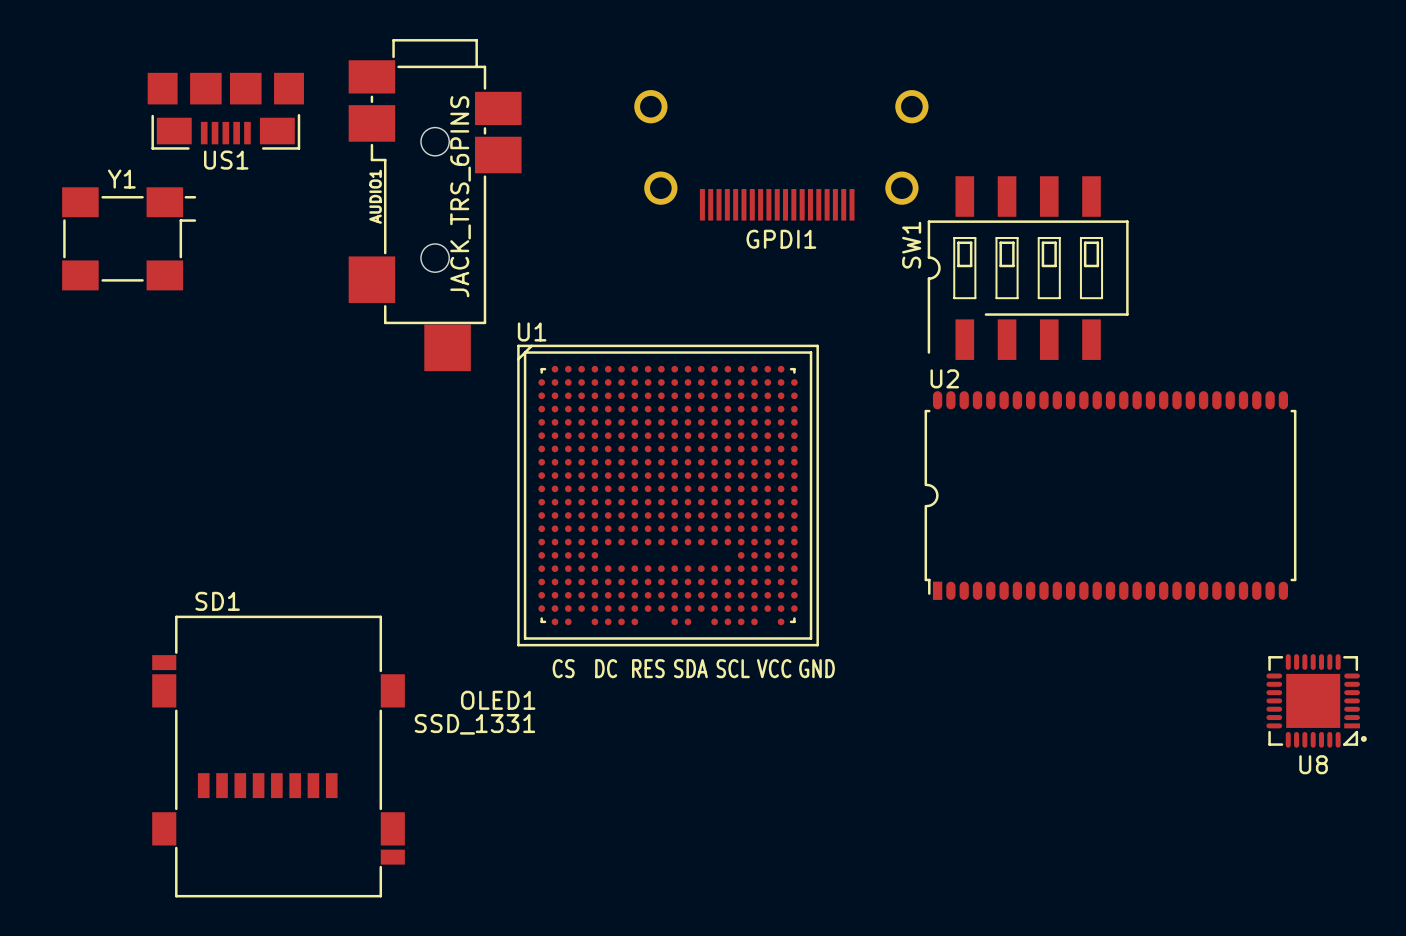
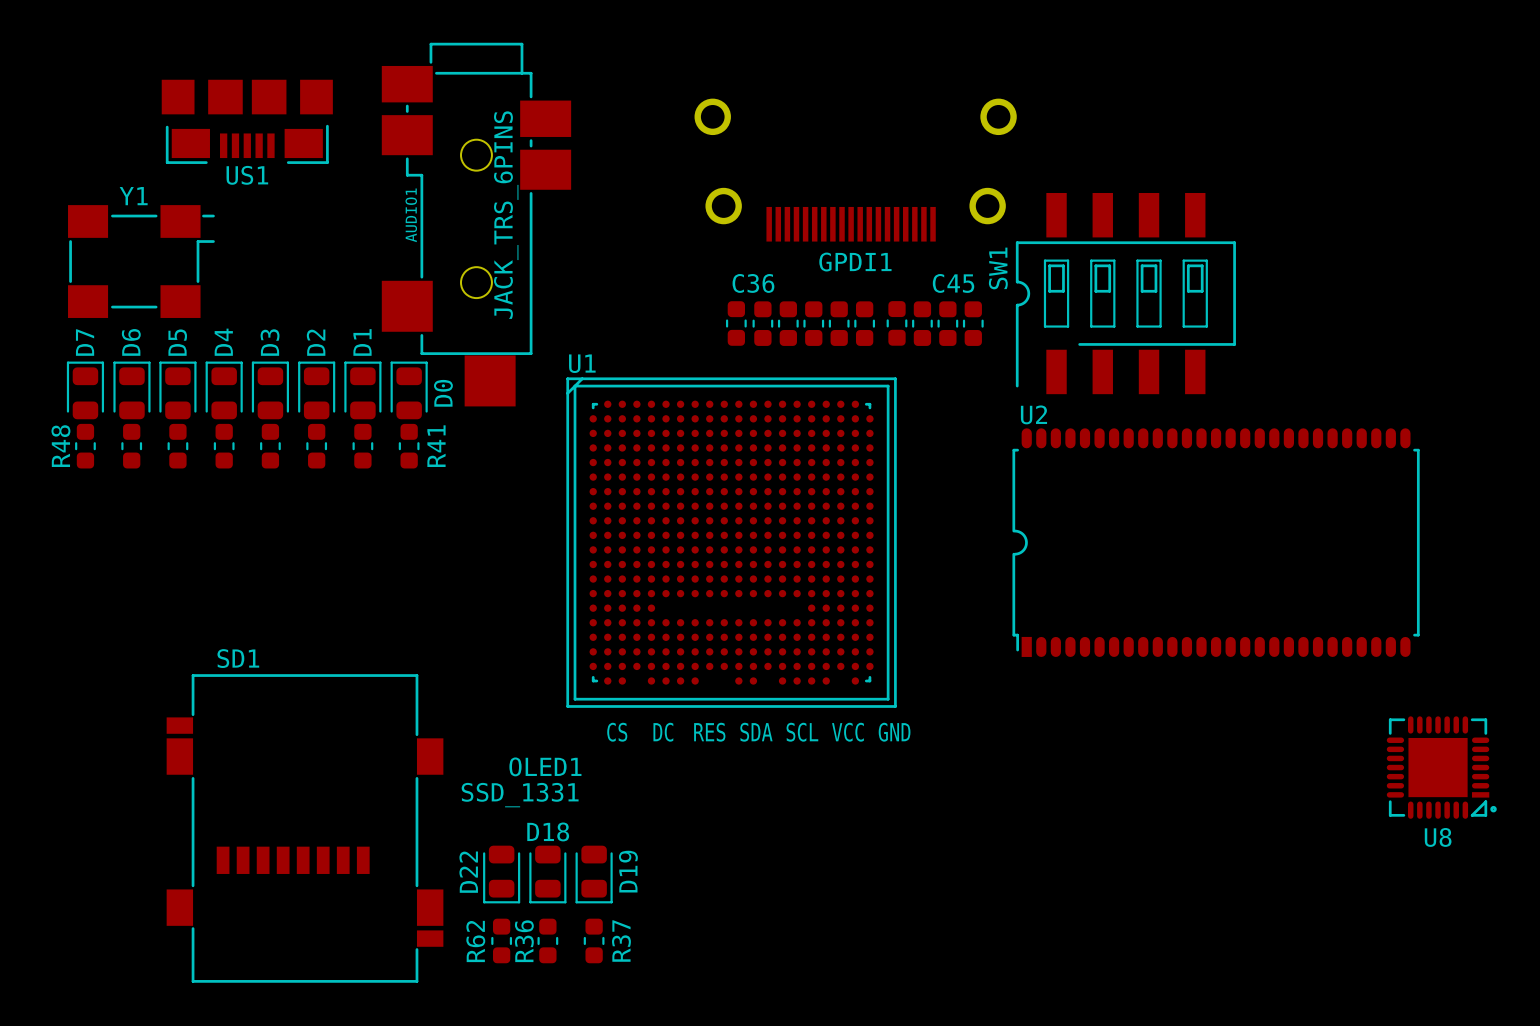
part: none -> (736, 323)
part: none -> (762, 323)
part: none -> (788, 323)
part: none -> (813, 323)
part: none -> (839, 323)
part: none -> (864, 323)
C45: none -> (897, 323)
part: none -> (922, 323)
C36: none -> (947, 323)
part: none -> (973, 323)
D7: none -> (85, 390)
D6: none -> (131, 390)
D5: none -> (177, 390)
D4: none -> (224, 390)
D3: none -> (270, 390)
D2: none -> (316, 390)
D1: none -> (362, 390)
D0: none -> (409, 390)
R48: none -> (85, 446)
part: none -> (131, 446)
part: none -> (177, 446)
part: none -> (224, 446)
part: none -> (270, 446)
part: none -> (316, 446)
part: none -> (362, 446)
R41: none -> (409, 446)
D22: none -> (501, 874)
D18: none -> (547, 874)
D19: none -> (594, 874)
R62: none -> (501, 940)
R36: none -> (547, 940)
R37: none -> (594, 940)

